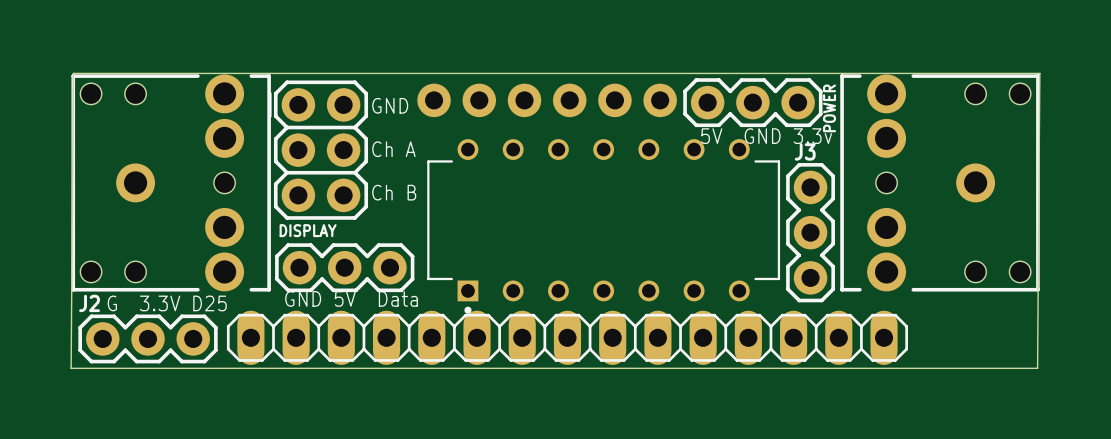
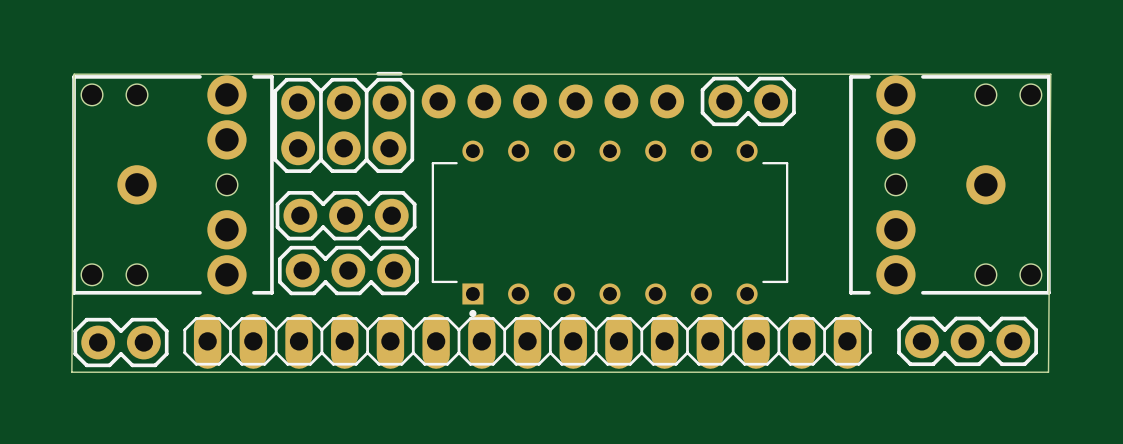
part: none -> (748, 101)
POWER: (752, 102) -> none
text: GND (390, 105) -> none
text: 5V GND 3.3v (766, 136) -> none
text: Ch A (393, 149) -> none
part rotation: 0° (318, 150) -> 90° clockwise (343, 122)
text: Ch B (394, 192) -> none
part: none -> (346, 215)
DISPLAY name: DISPLAY (308, 230) -> none
J3: (810, 232) -> none
text: GND 5V Data (351, 298) -> none
text: G 3.3V D25 (167, 303) -> none
part position: (567, 337) -> (527, 341)
part: none -> (967, 341)
part: none -> (121, 342)
J2: (148, 338) -> none

